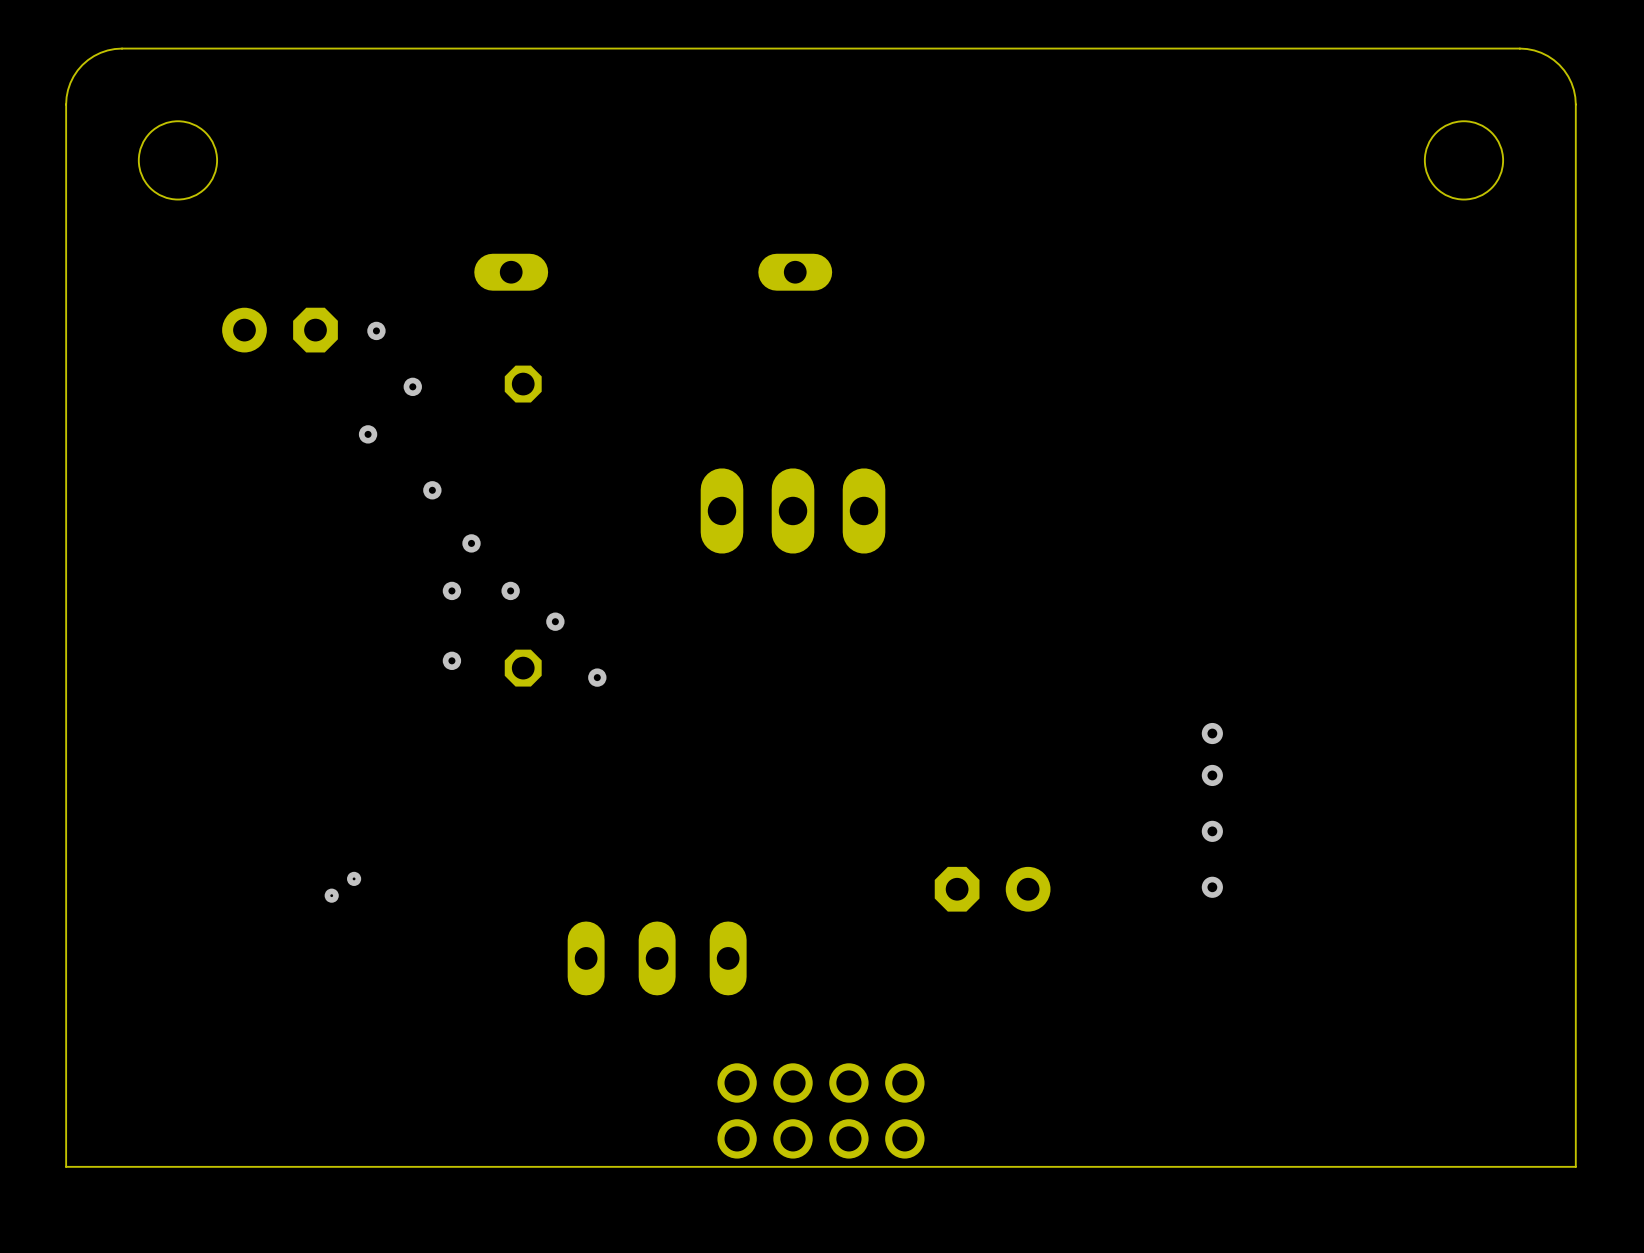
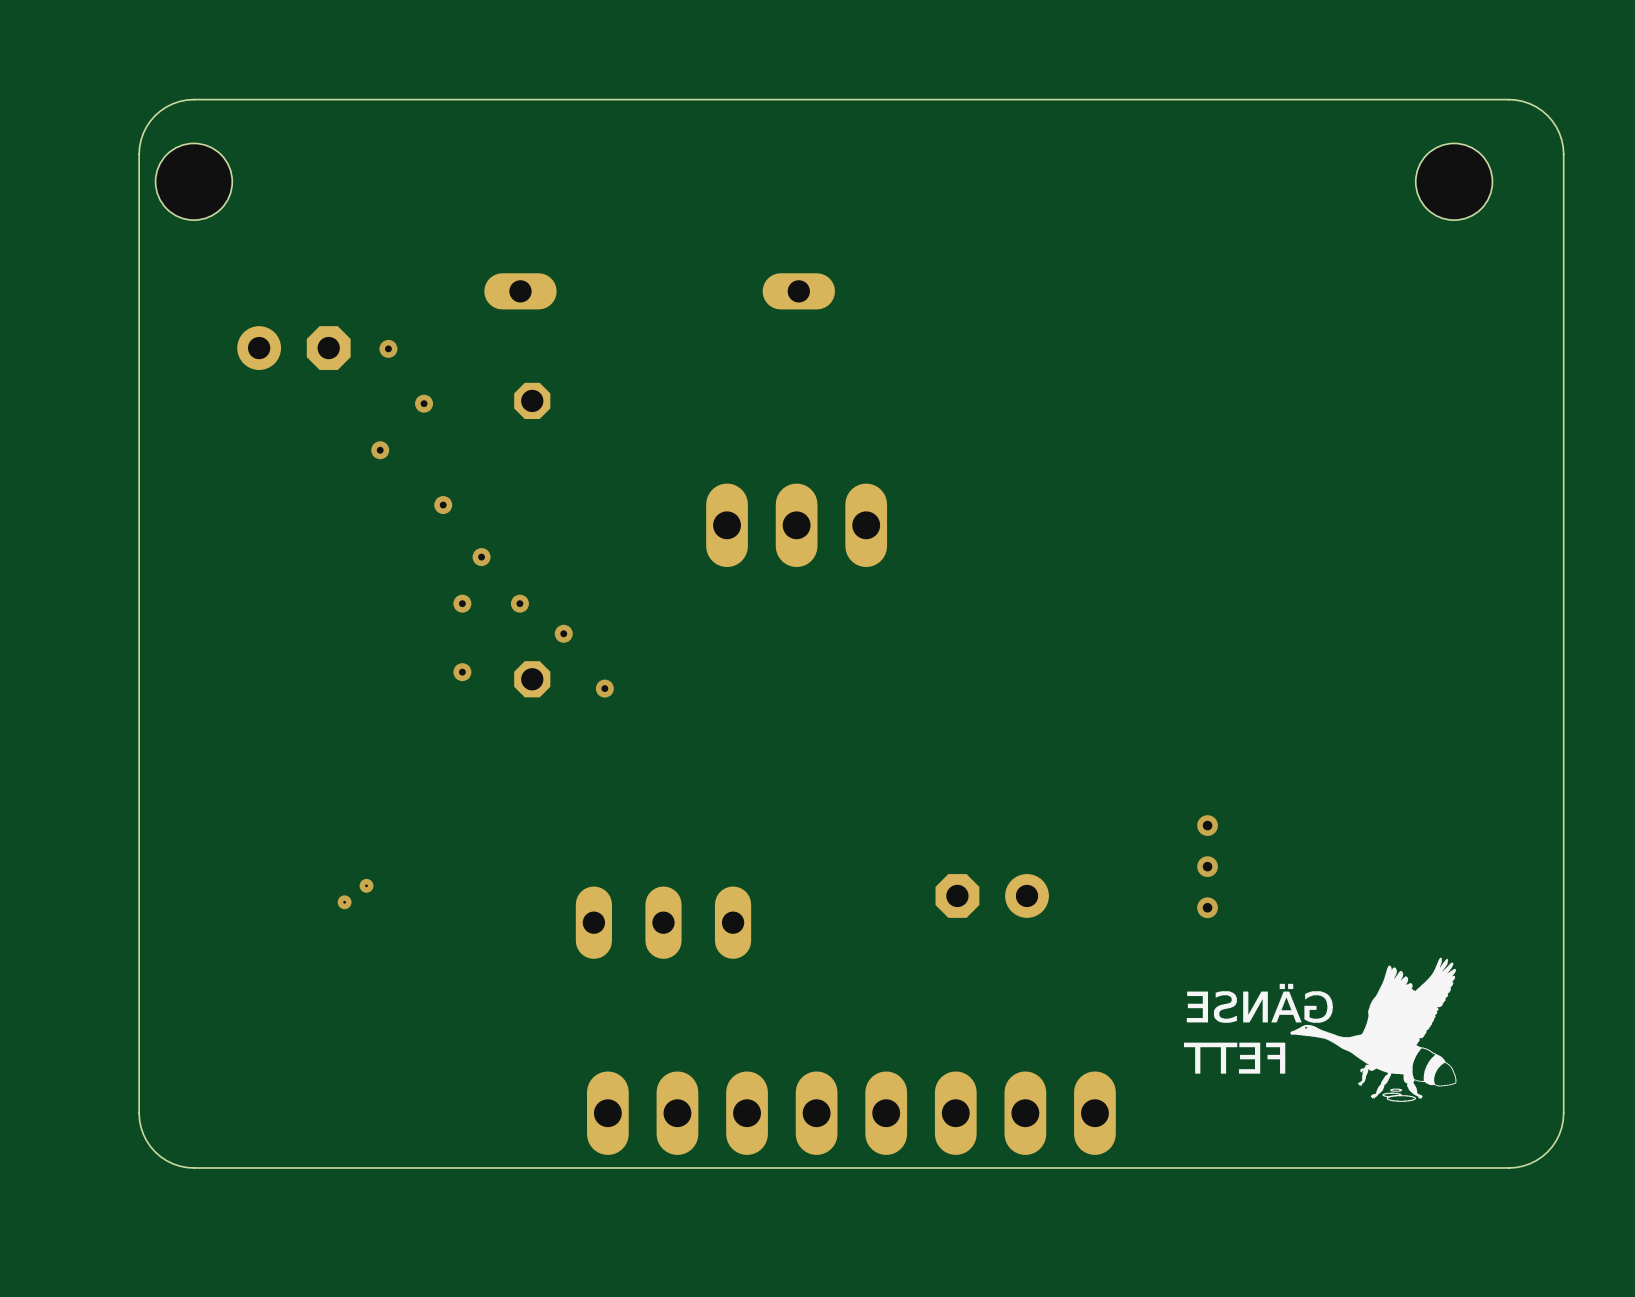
board edge: (1575, 132) (1575, 97) (1568, 76) (1559, 64) (1547, 56) (1534, 50) (1519, 48) (122, 48) (100, 52) (88, 60) (77, 70) (70, 83) (66, 104) (66, 1166) (177, 1166) -> (1563, 154) (1559, 133) (1547, 115) (1529, 103) (1508, 99) (193, 99) (172, 103) (160, 110) (150, 121) (143, 133) (139, 154) (139, 1113) (143, 1134) (155, 1151) (172, 1163) (193, 1168)
via: (1212, 733) -> none
via: (1212, 775) -> none
via position: (1212, 831) -> (1207, 825)
via: none -> (1207, 866)
via position: (1212, 887) -> (1207, 907)
drawing: none -> [1184, 957, 1457, 1102]
part position: (657, 958) -> (663, 922)
part footprint: [717, 1063, 925, 1159] -> [586, 1071, 1116, 1155]
board edge: (1575, 1110) (1575, 1166) (1519, 1166) -> (1563, 1113) (1559, 1134) (1547, 1151) (1529, 1163) (1508, 1168)

